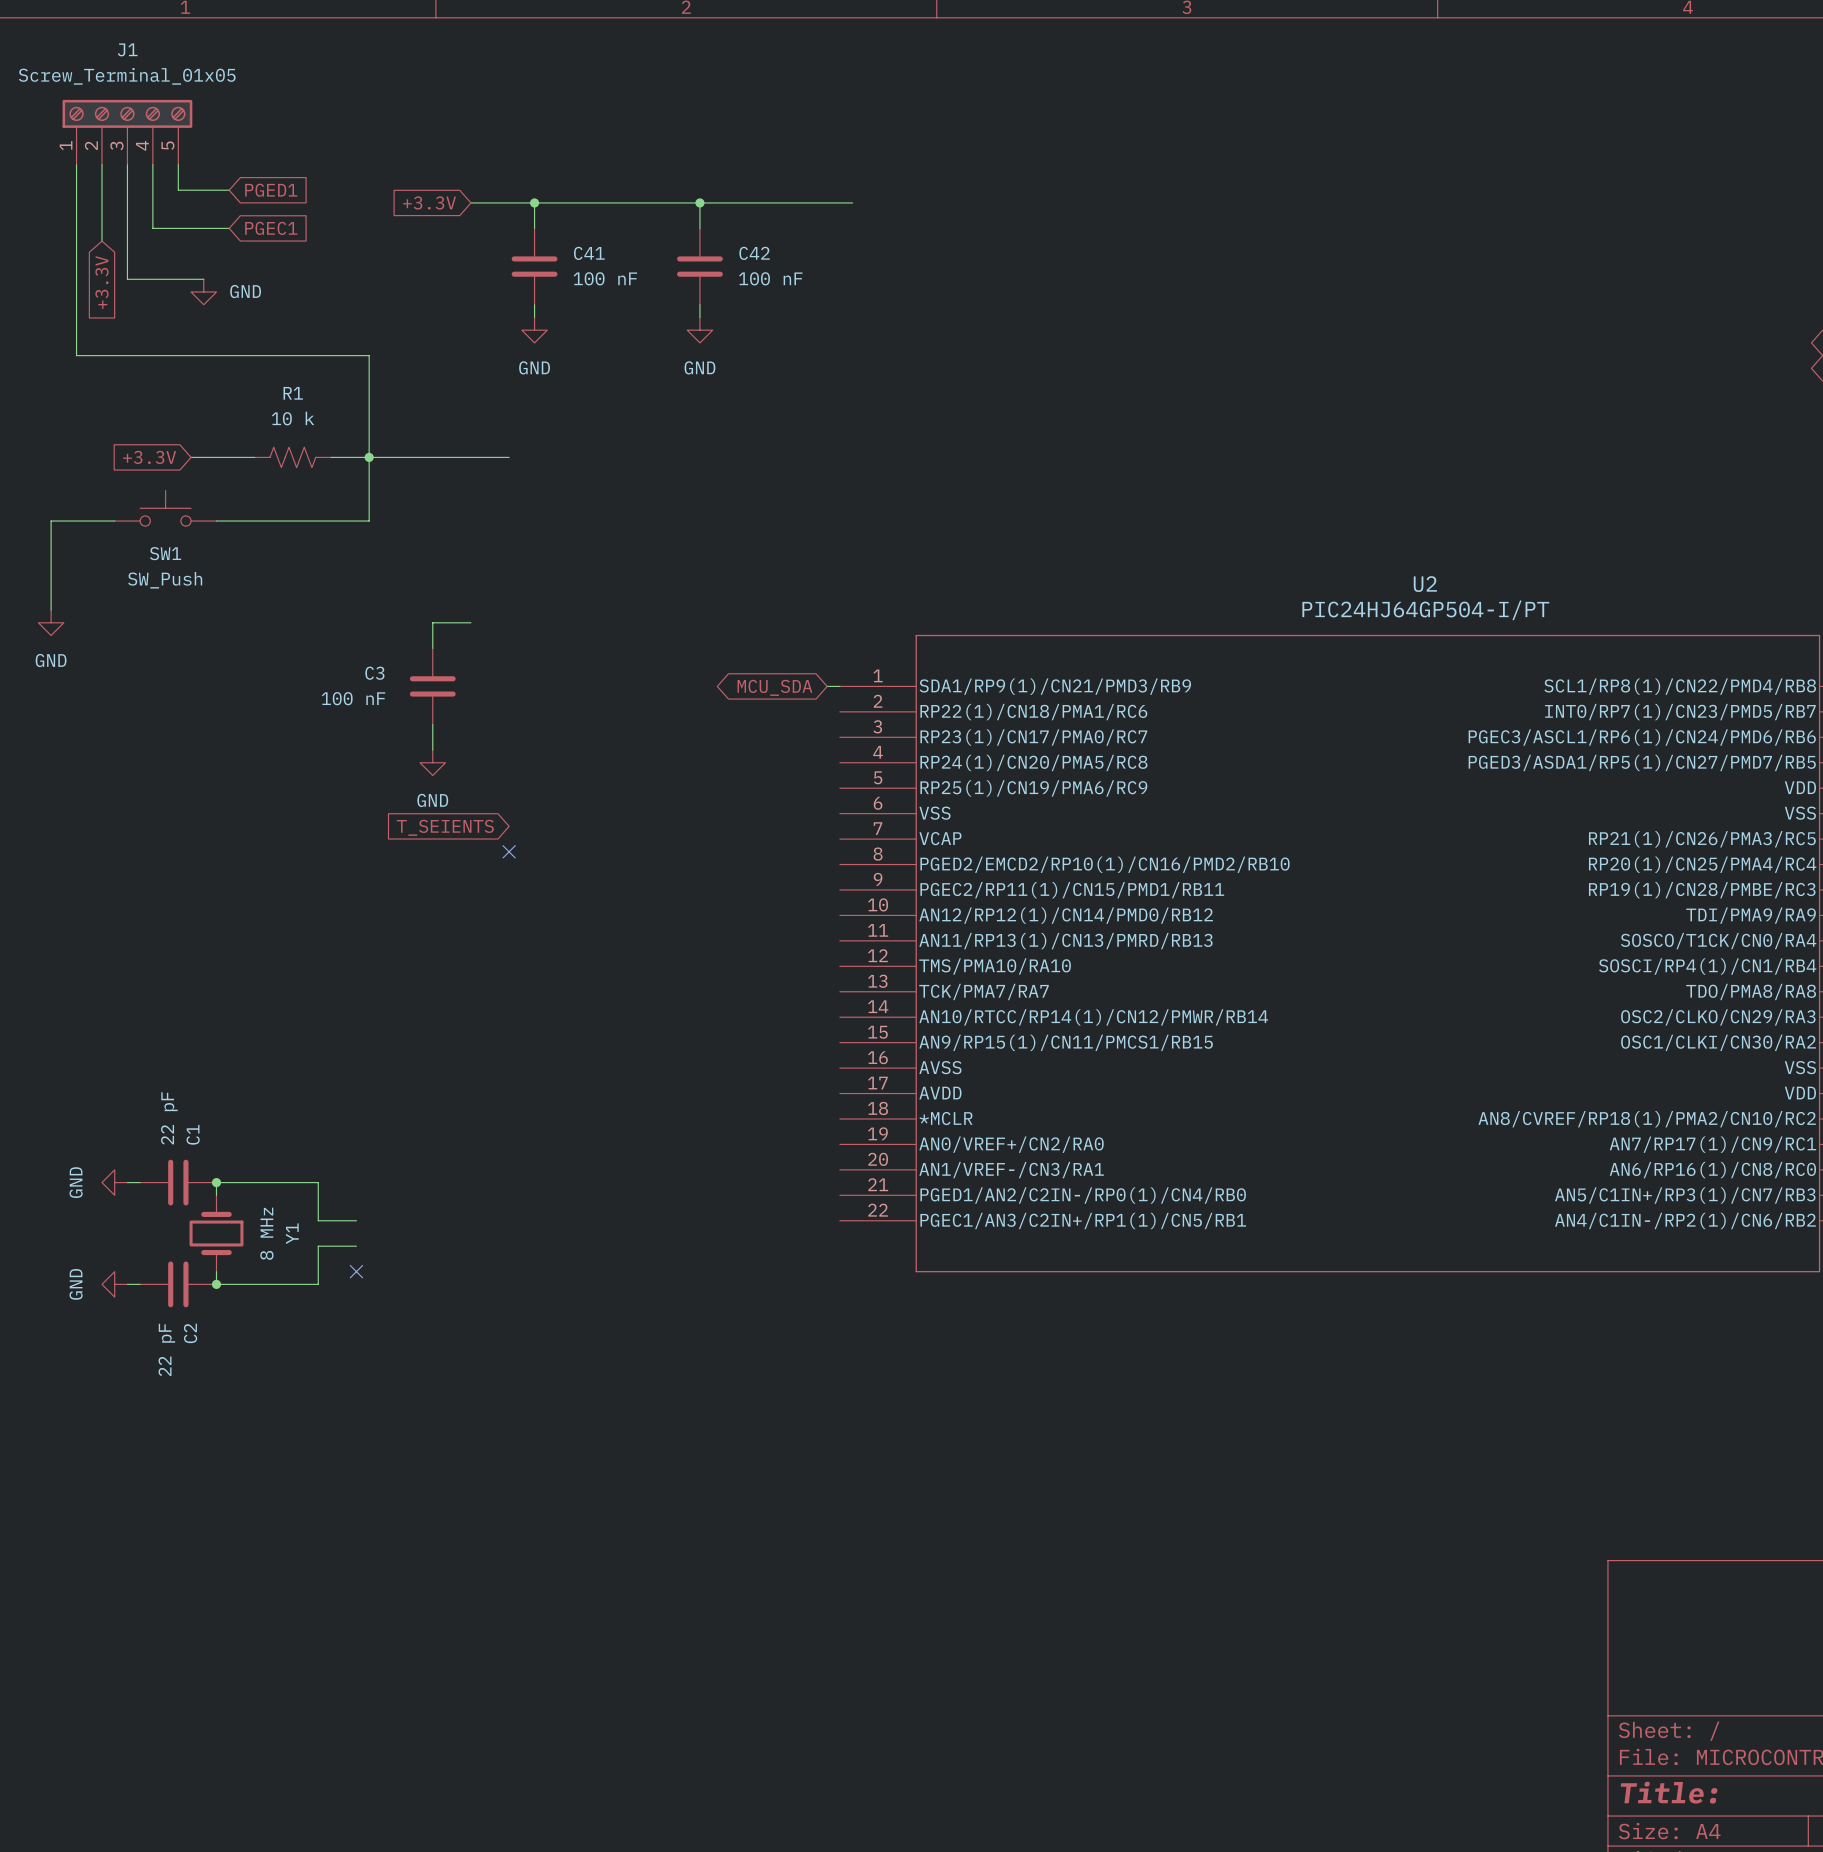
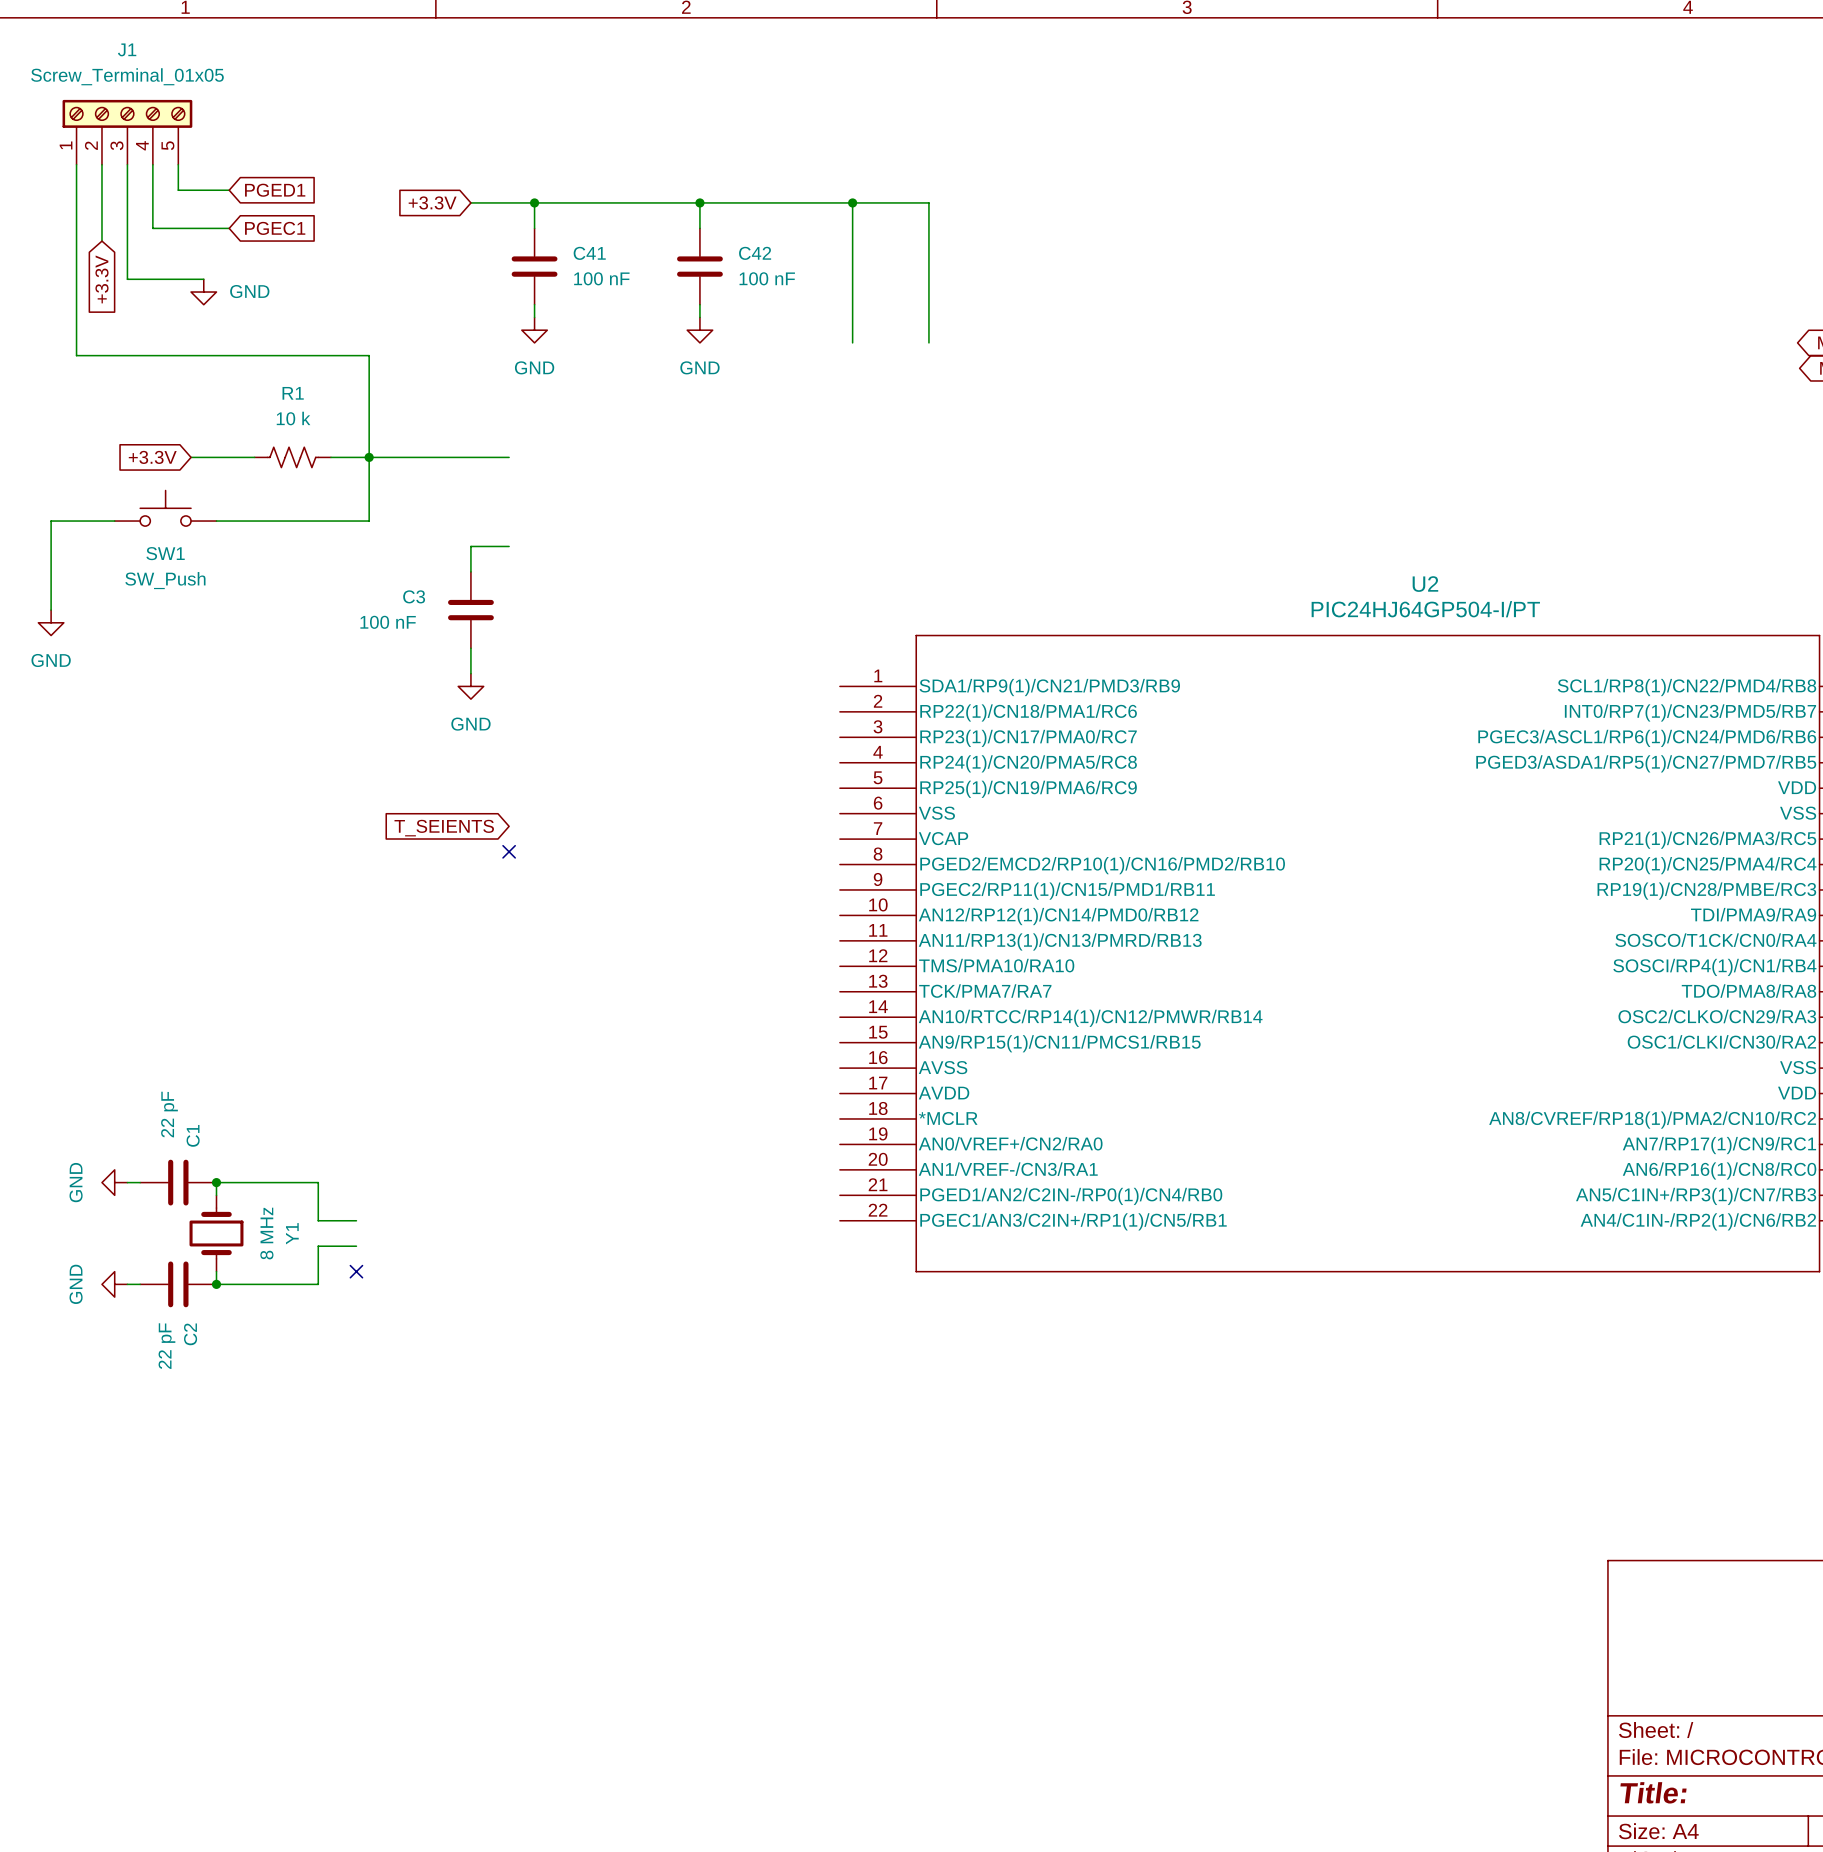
junction: none -> (852, 202)
wire: none -> (852, 342) (852, 202) (928, 202) (928, 342)
wire: (470, 622) (432, 622) (432, 648) -> (509, 546) (470, 546) (470, 571)
C3 position: (432, 686) -> (470, 610)
wire: (827, 686) (839, 686) -> none
global label: MCU_SDA (774, 687) -> none
wire: (432, 724) (432, 750) -> (470, 648) (470, 673)
power symbol position: GND (432, 762) -> GND (470, 686)

